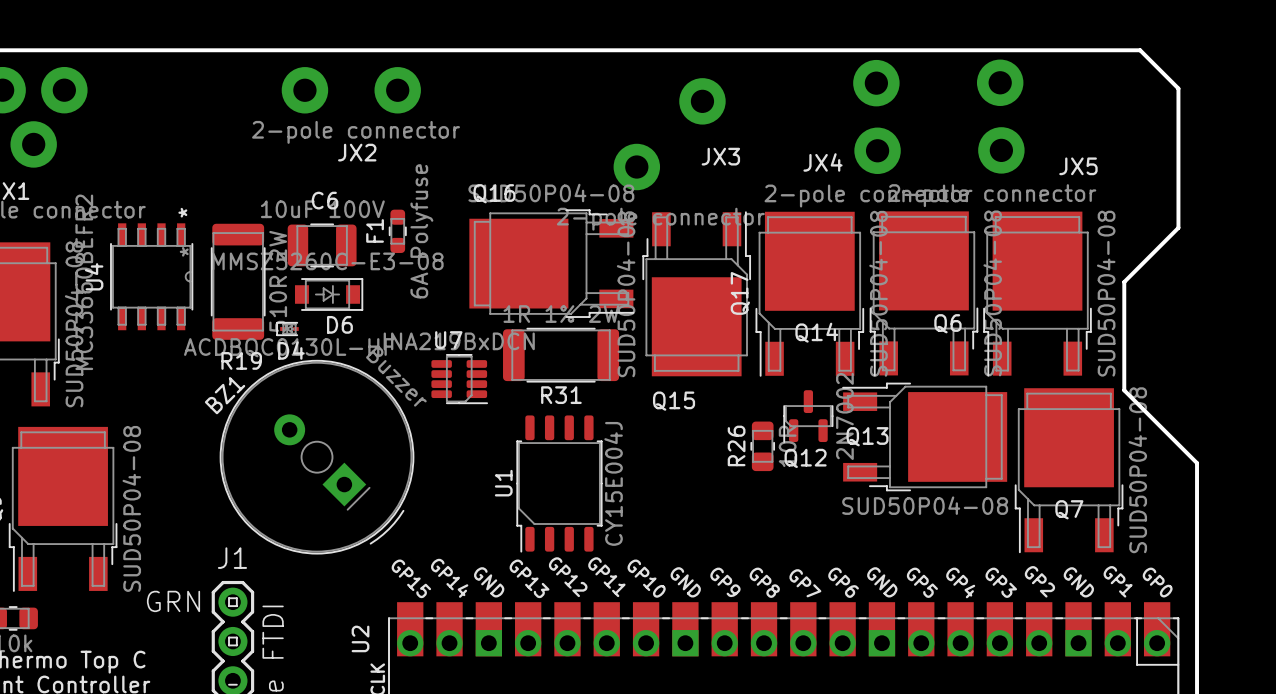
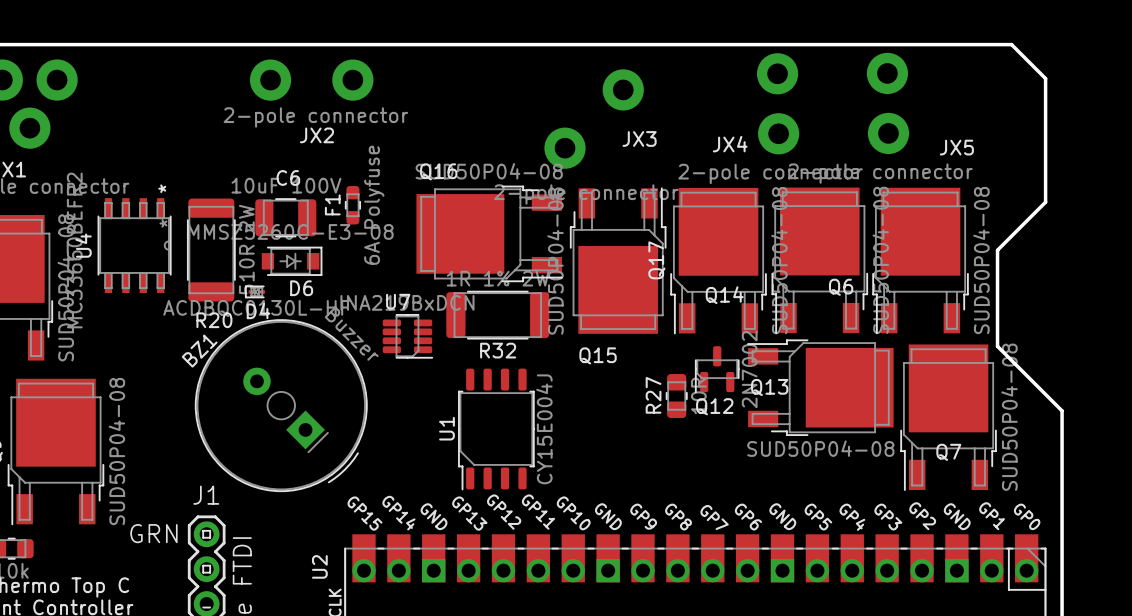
R19 name: R19 (241, 360) -> R20 (214, 320)
R31 name: R31 (561, 395) -> R32 (498, 350)
R26 name: R26 (736, 445) -> R27 (653, 395)

